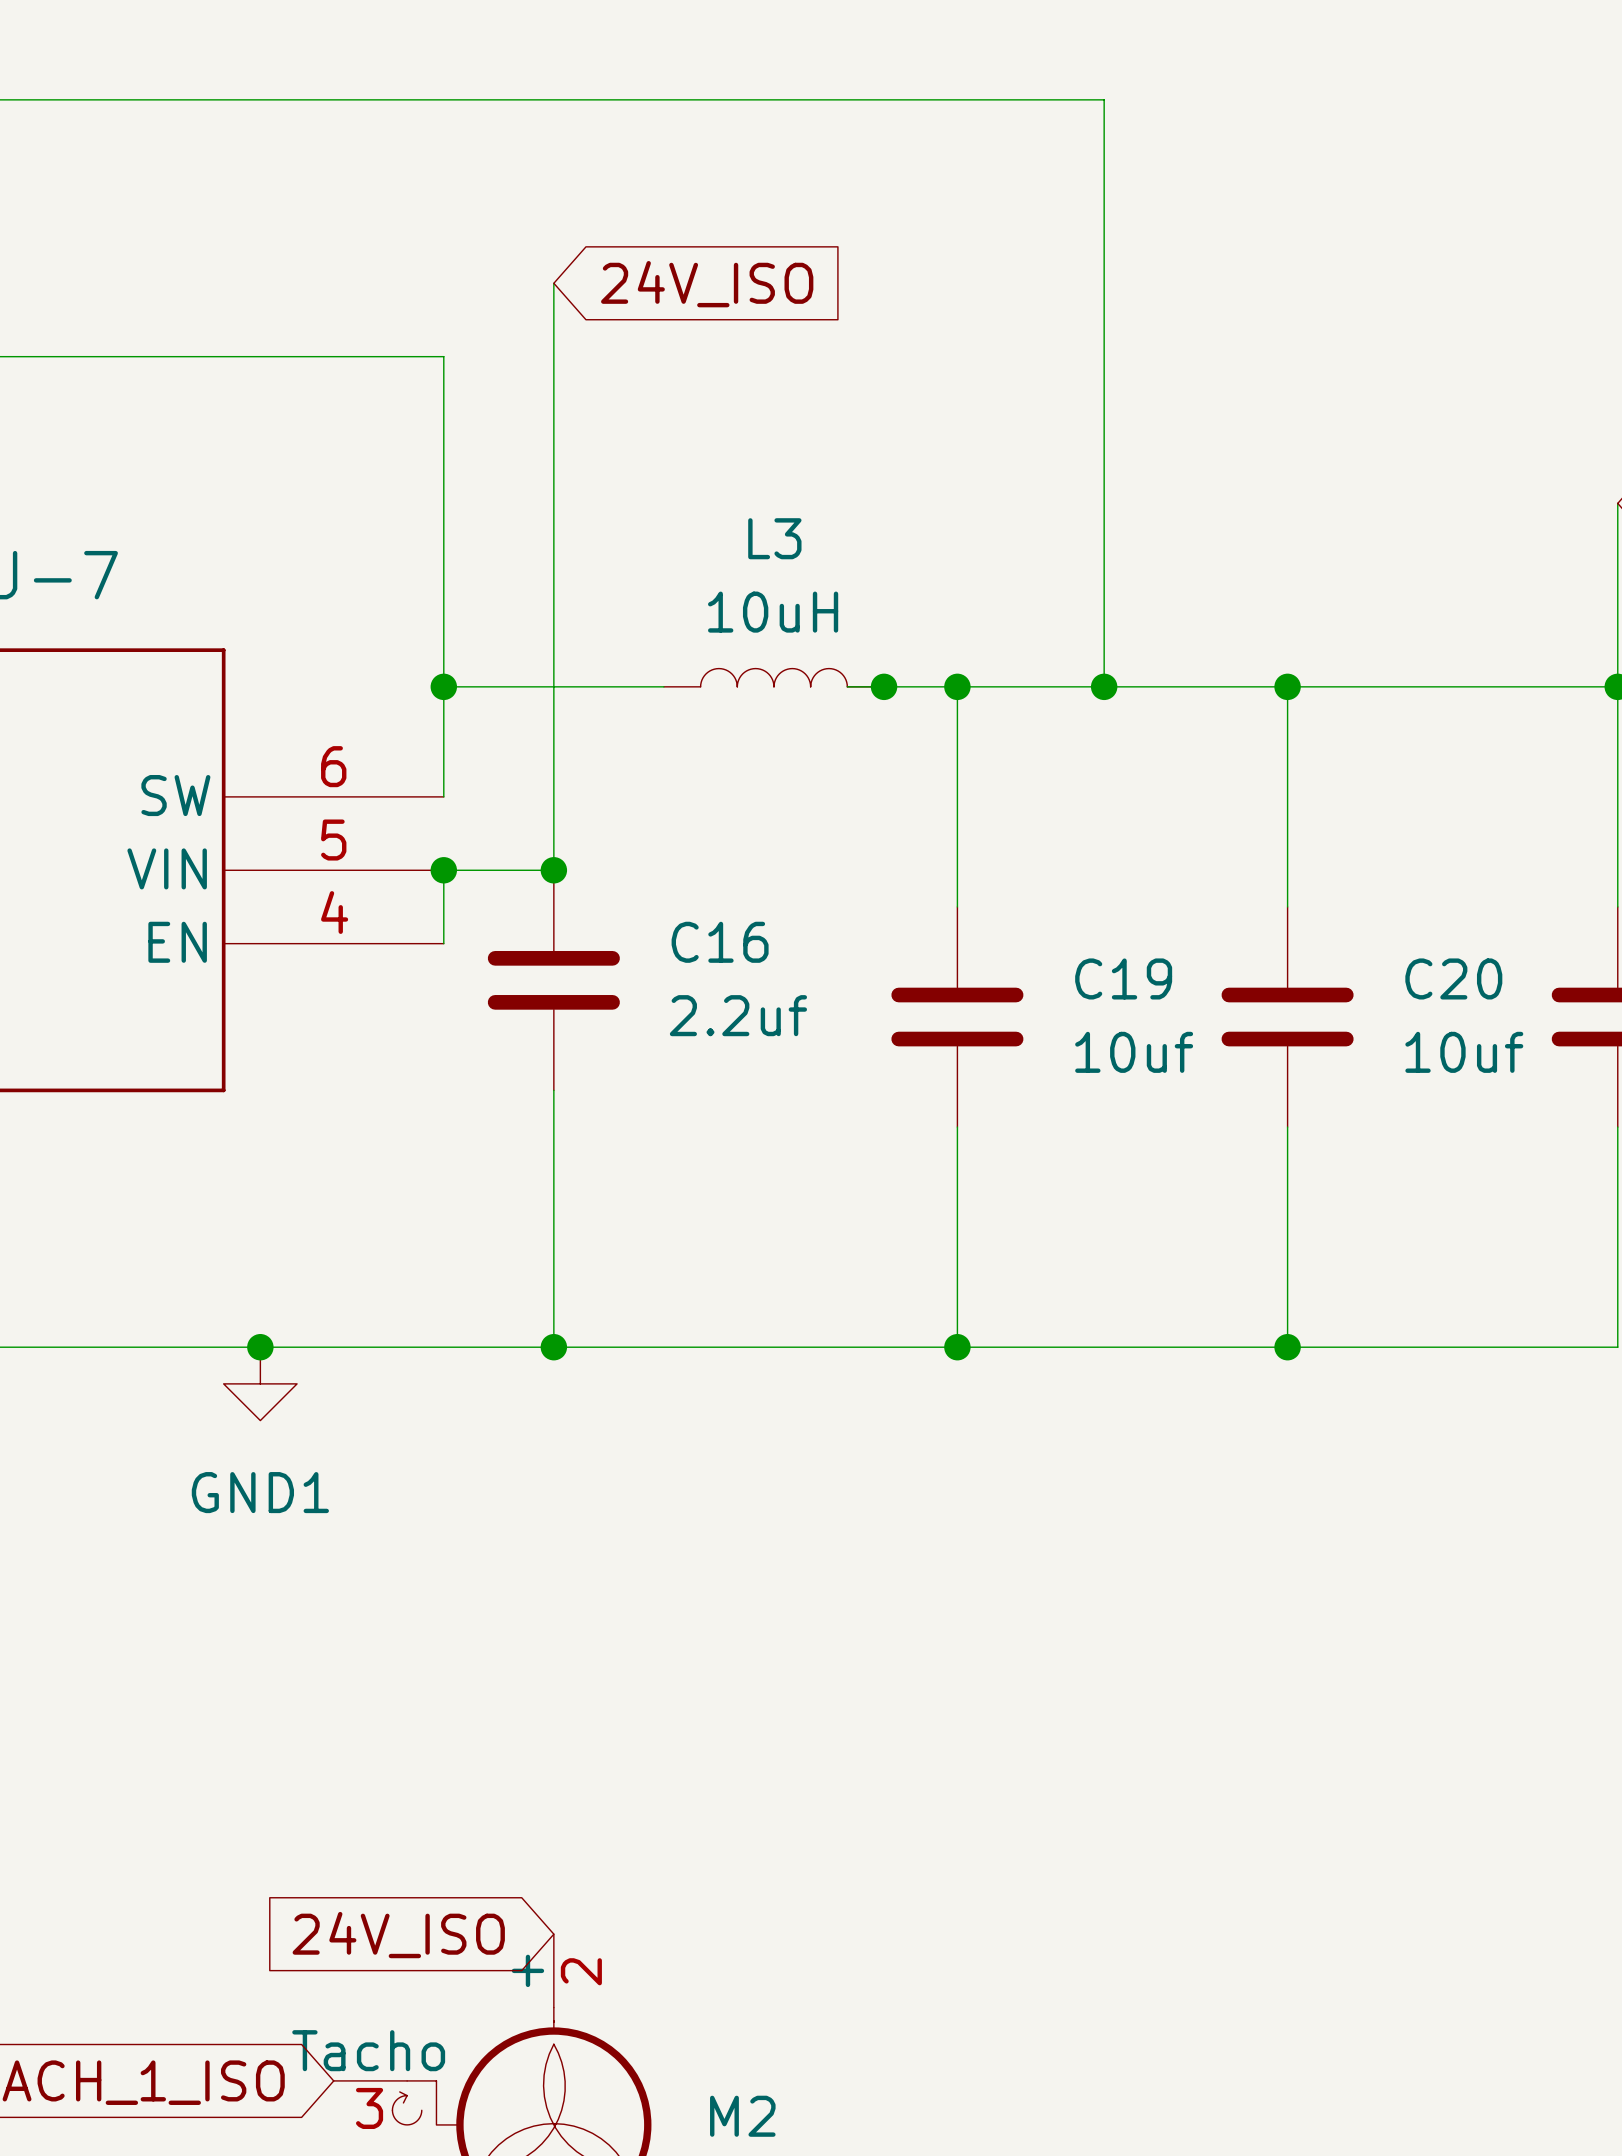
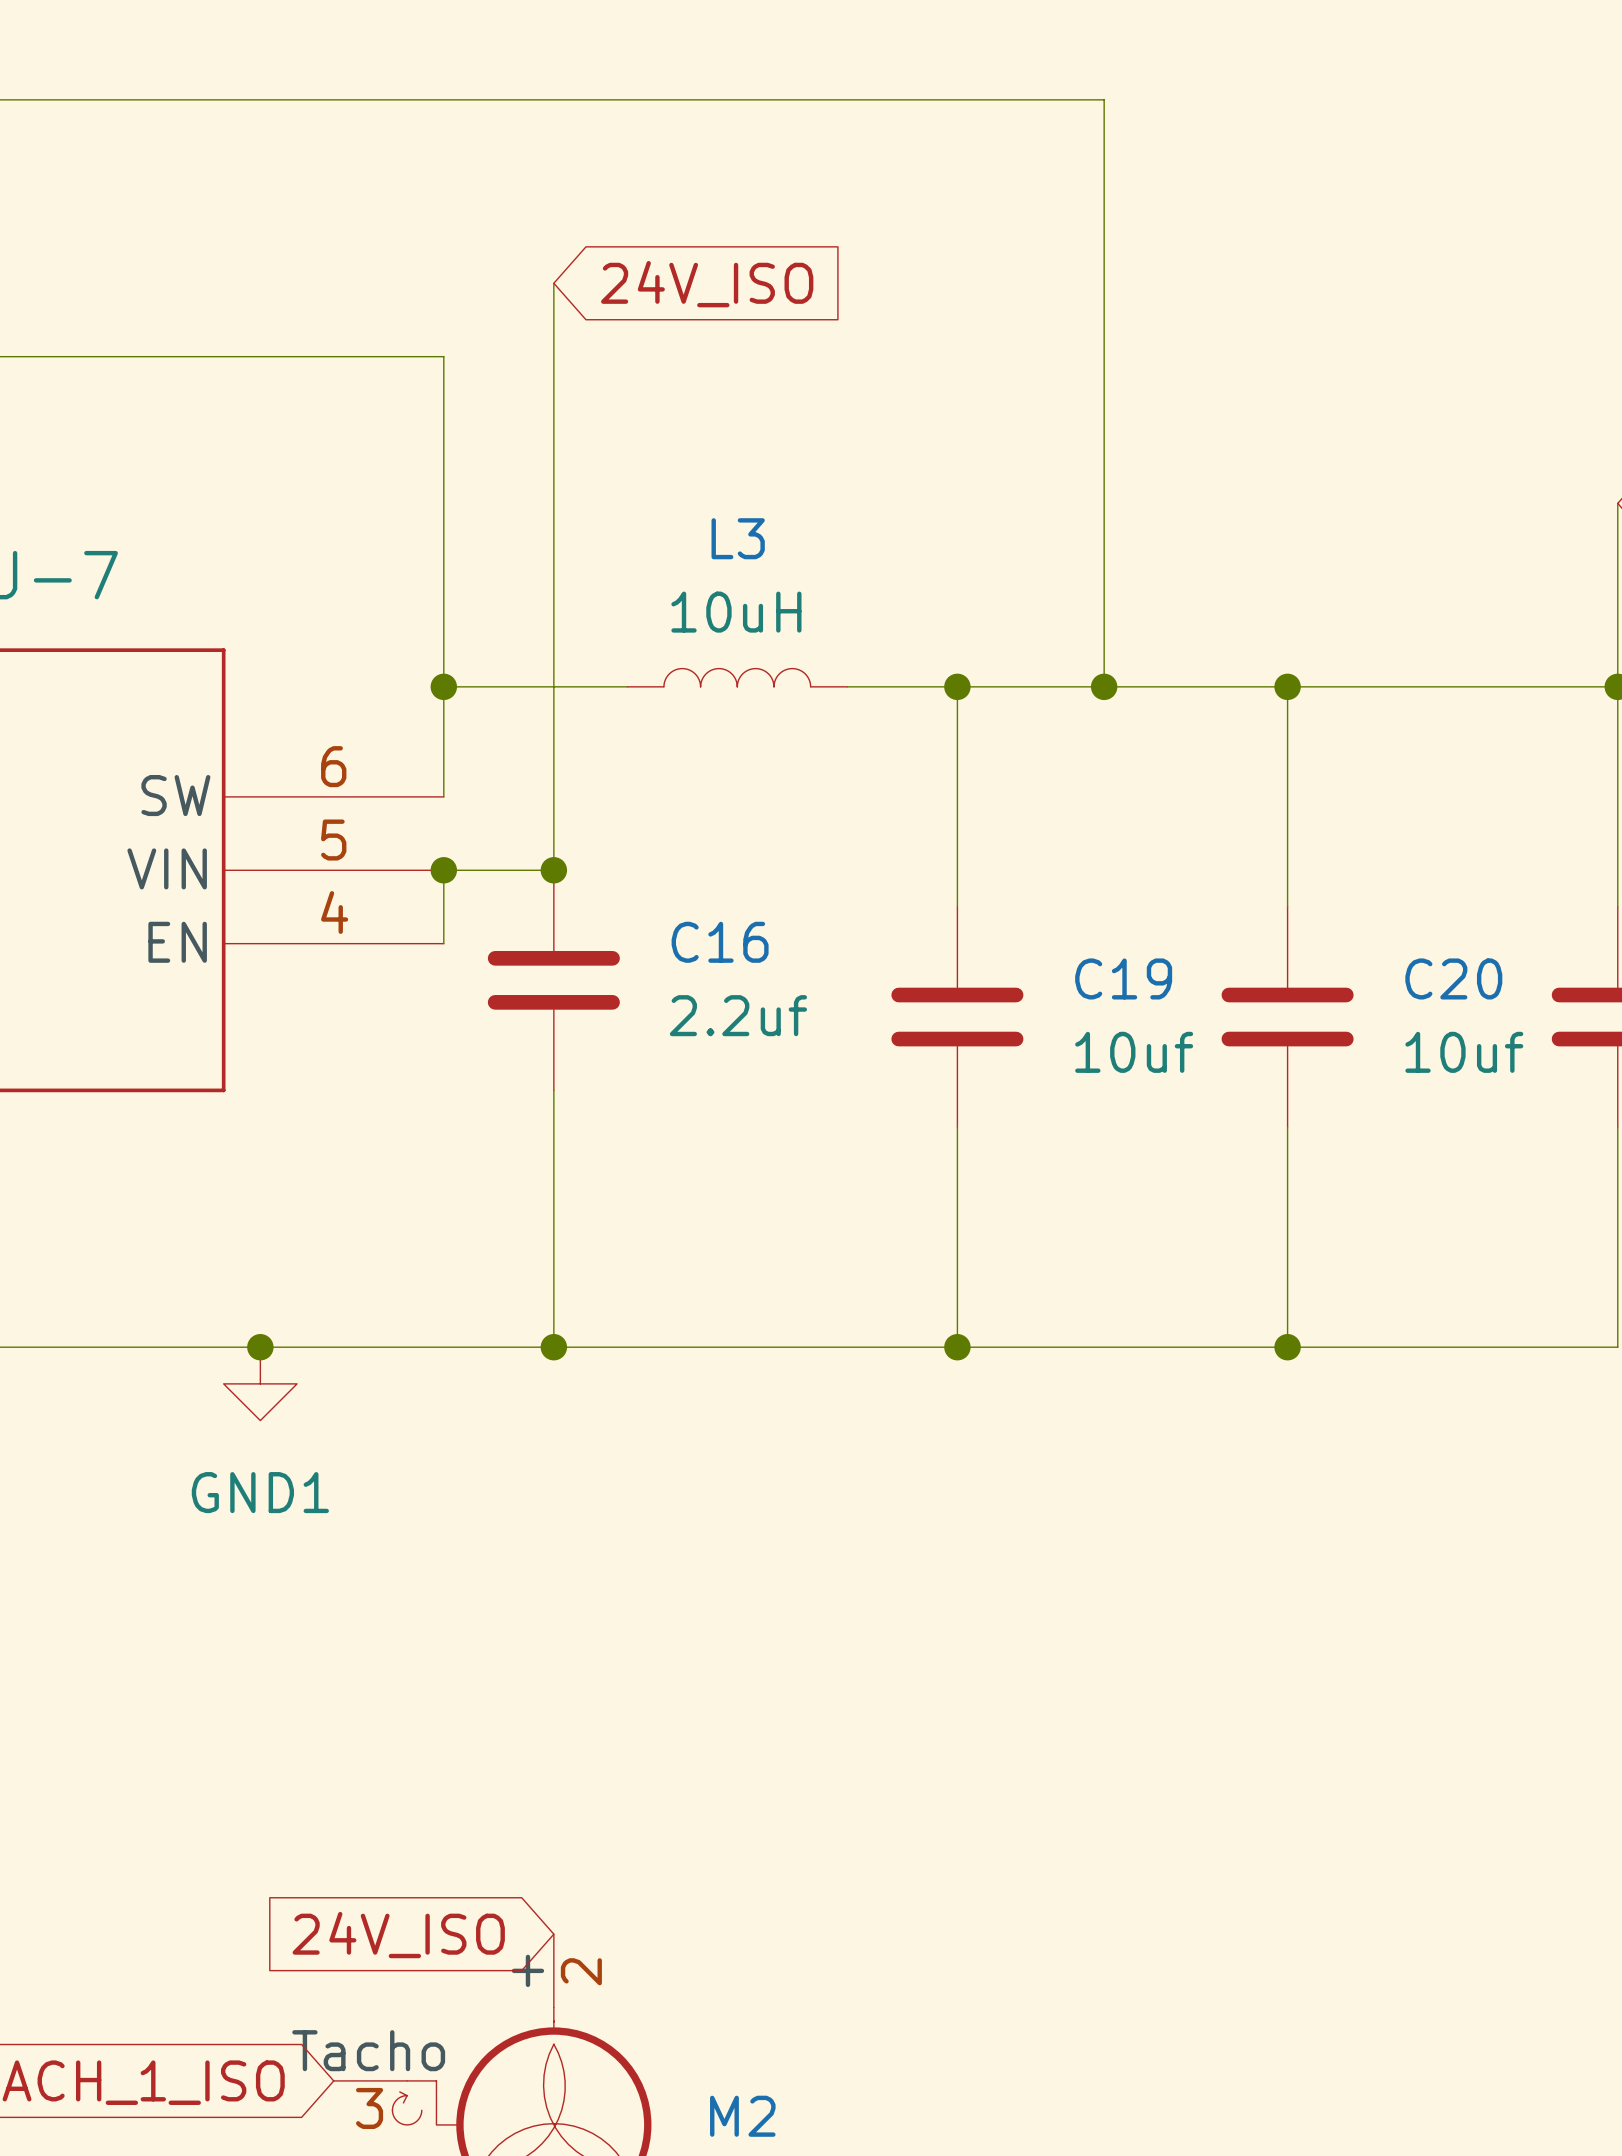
L3 position: (773, 677) -> (737, 677)
junction: (884, 686) -> none

